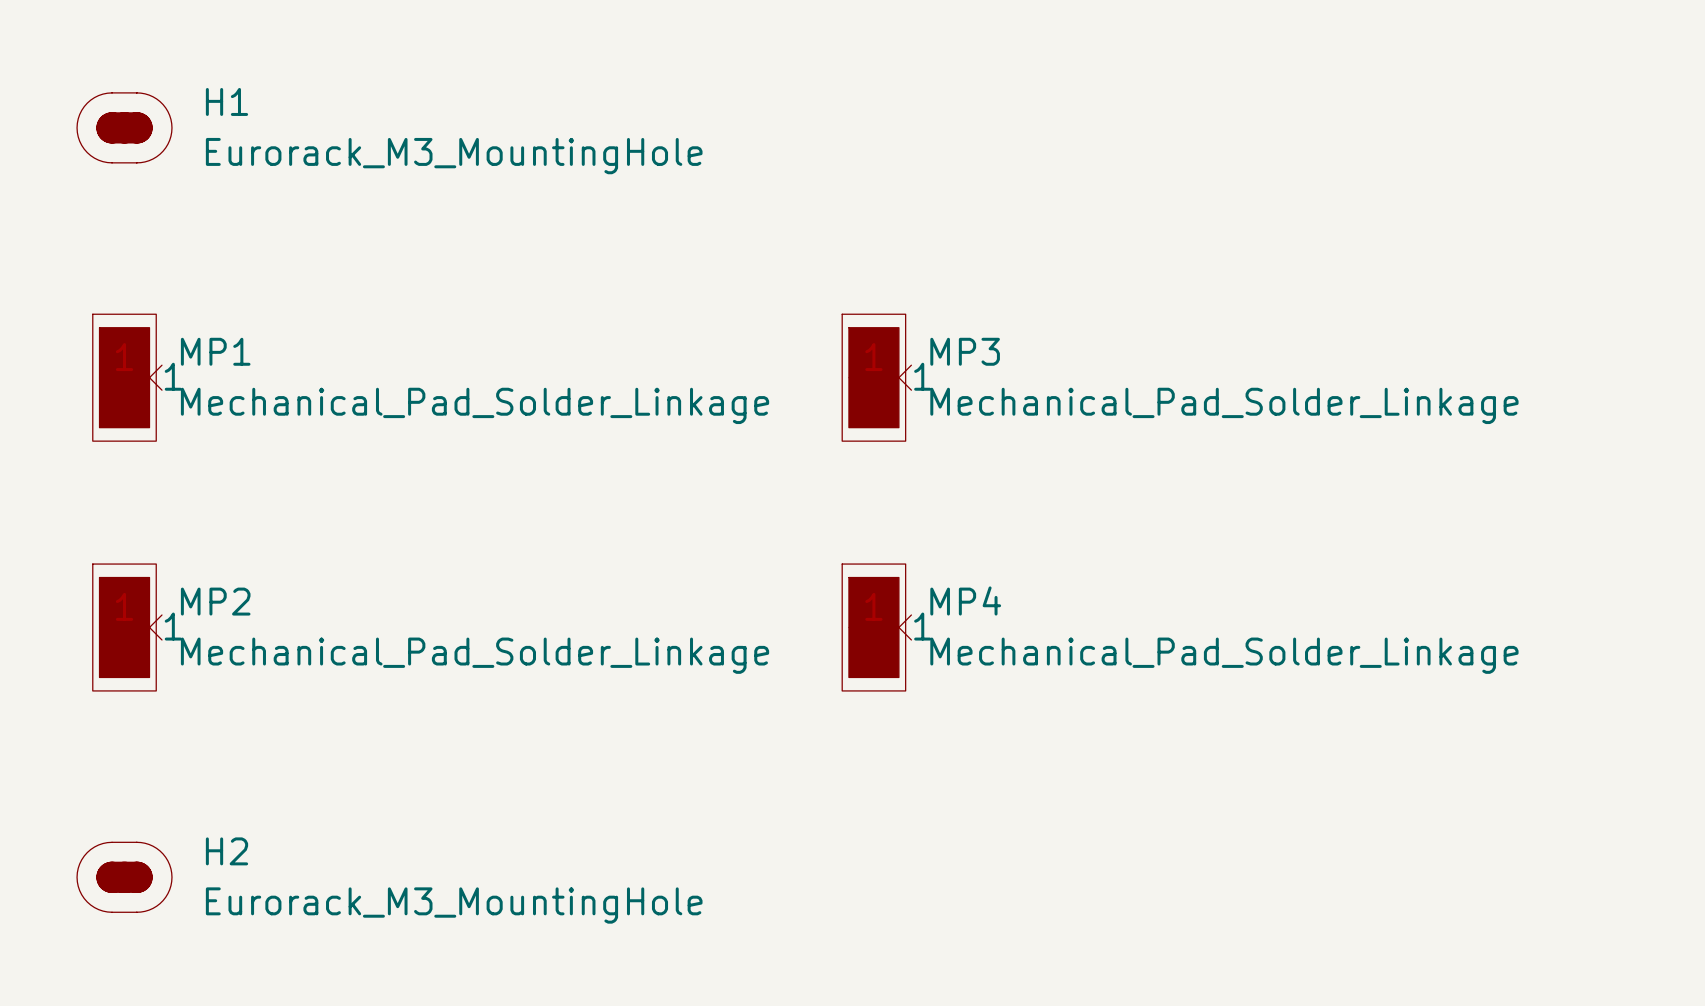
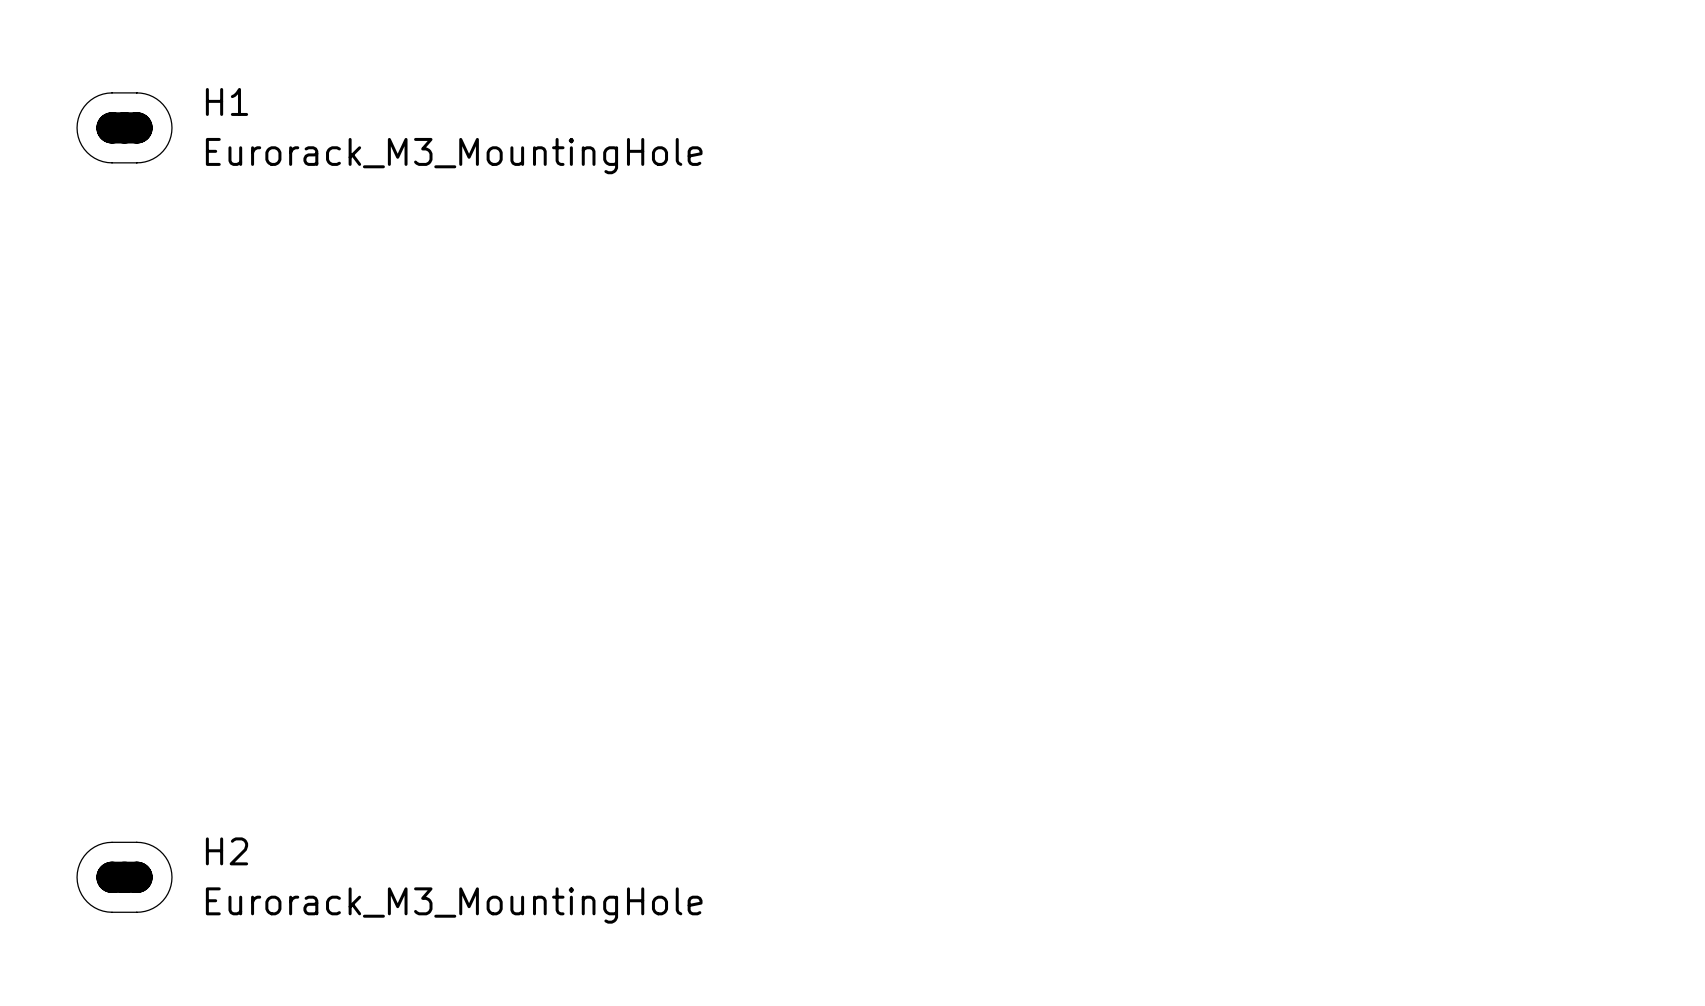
MP1: Mechanical_Pad_Solder_Linkage (127, 377) -> none
MP3: Mechanical_Pad_Solder_Linkage (876, 377) -> none
MP2: Mechanical_Pad_Solder_Linkage (127, 627) -> none
MP4: Mechanical_Pad_Solder_Linkage (876, 627) -> none

